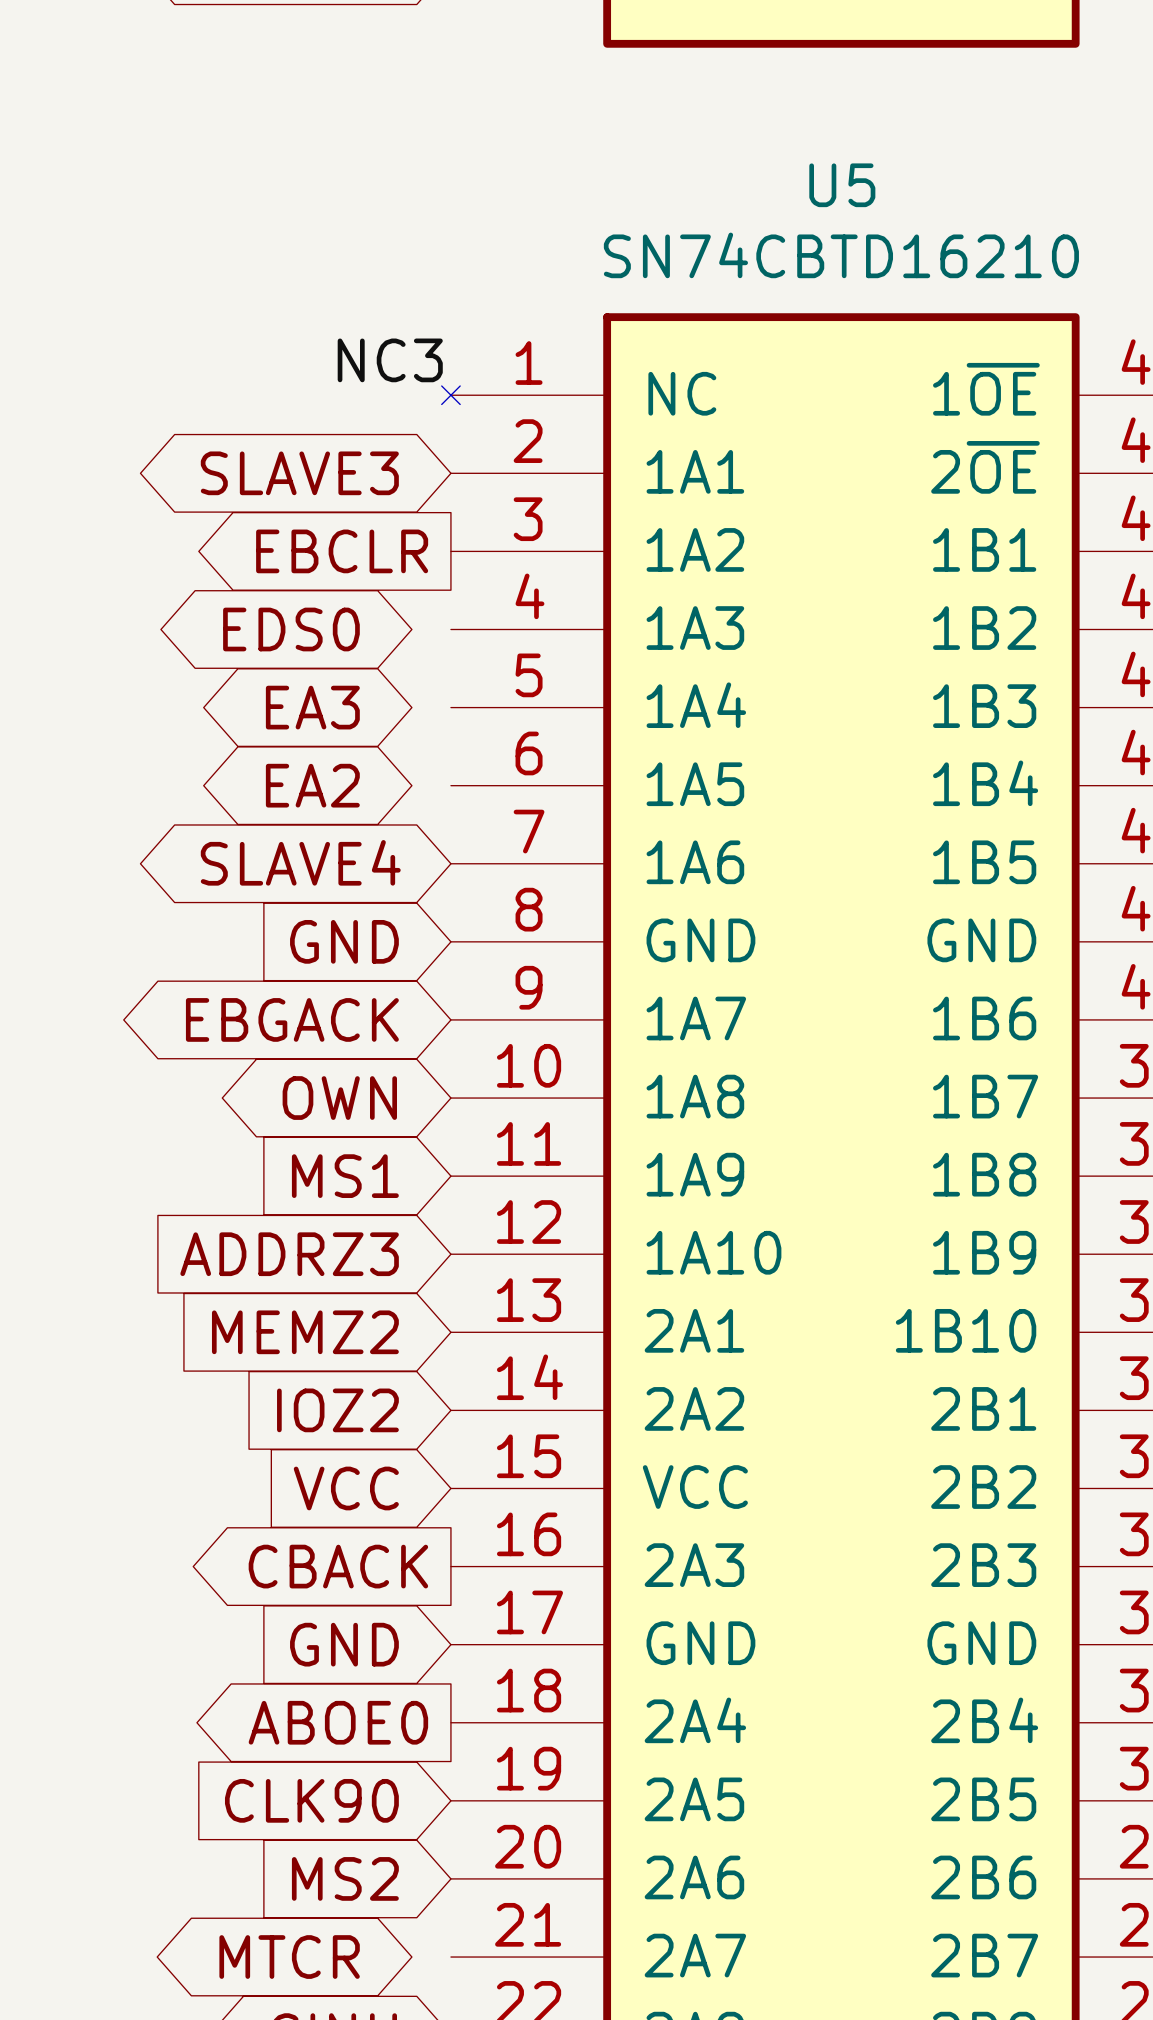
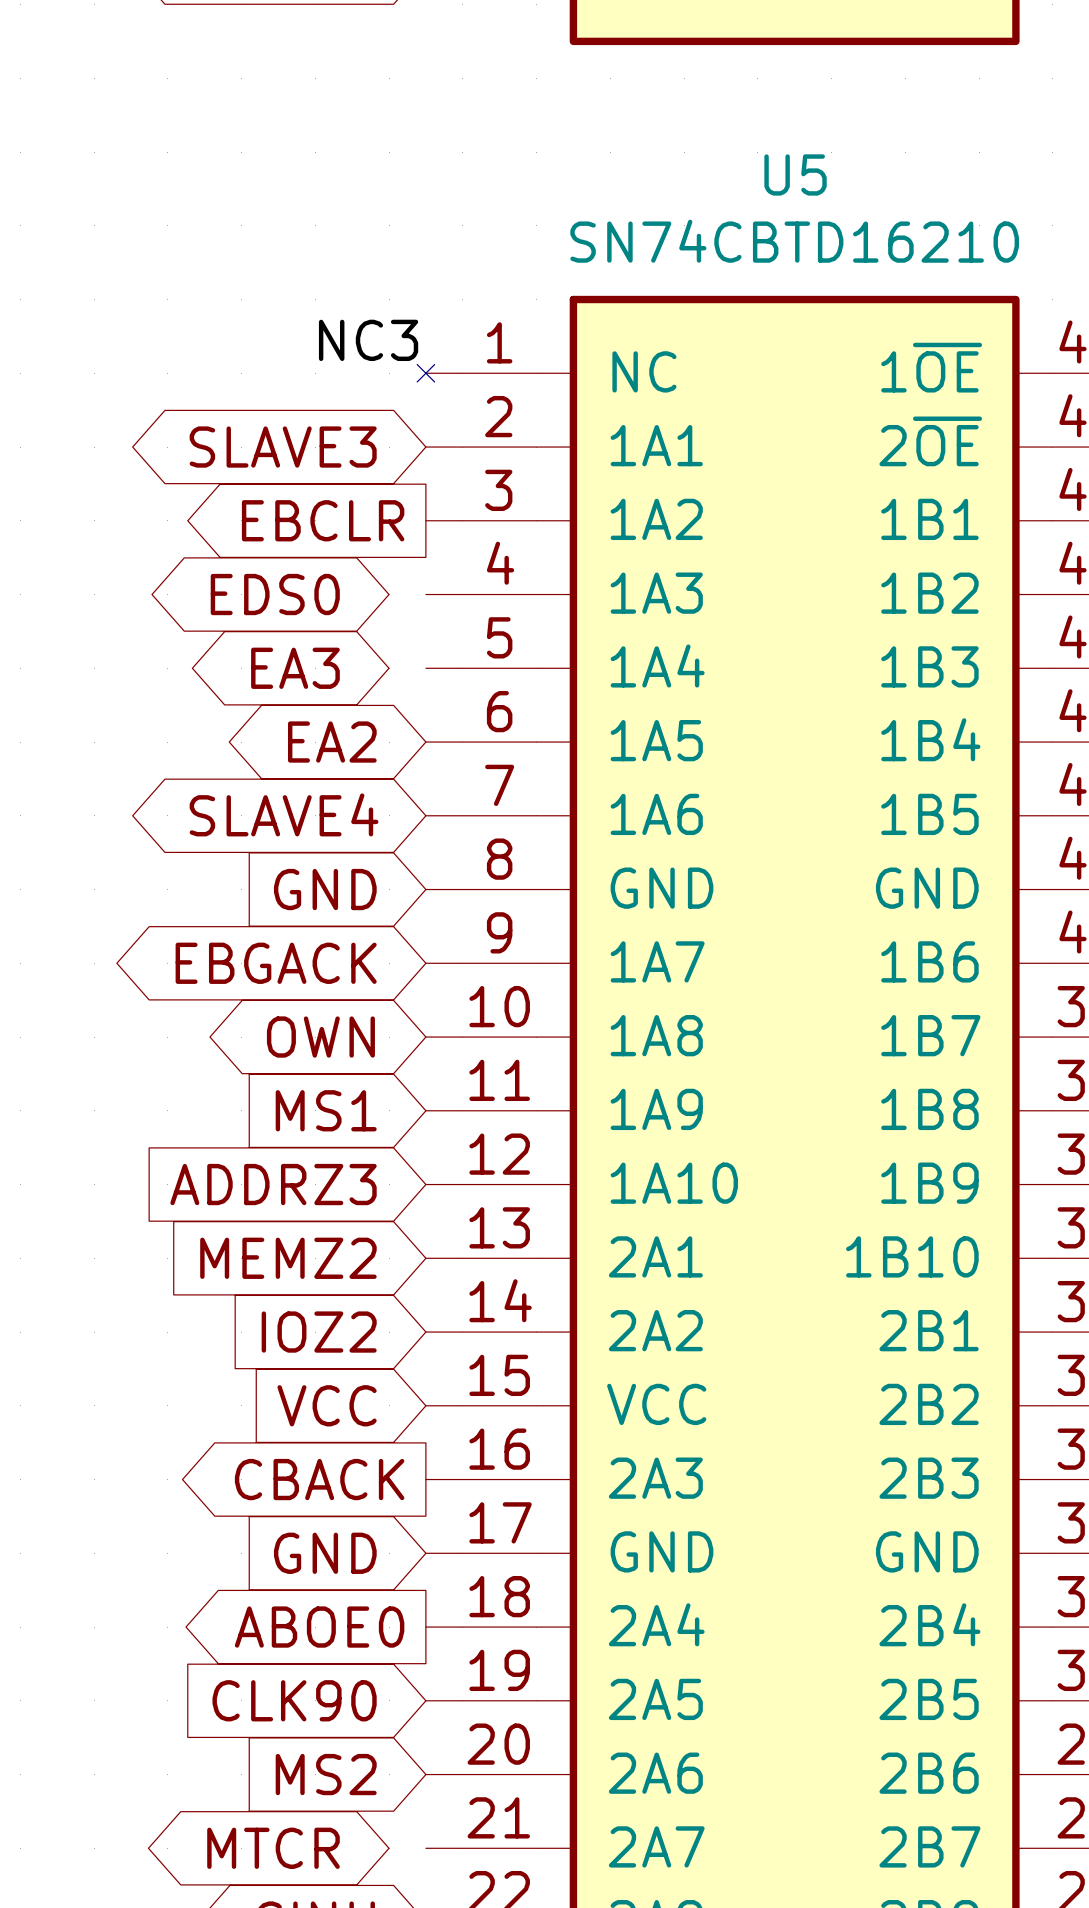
global label position: EA2 (312, 785) -> EA2 (332, 742)

